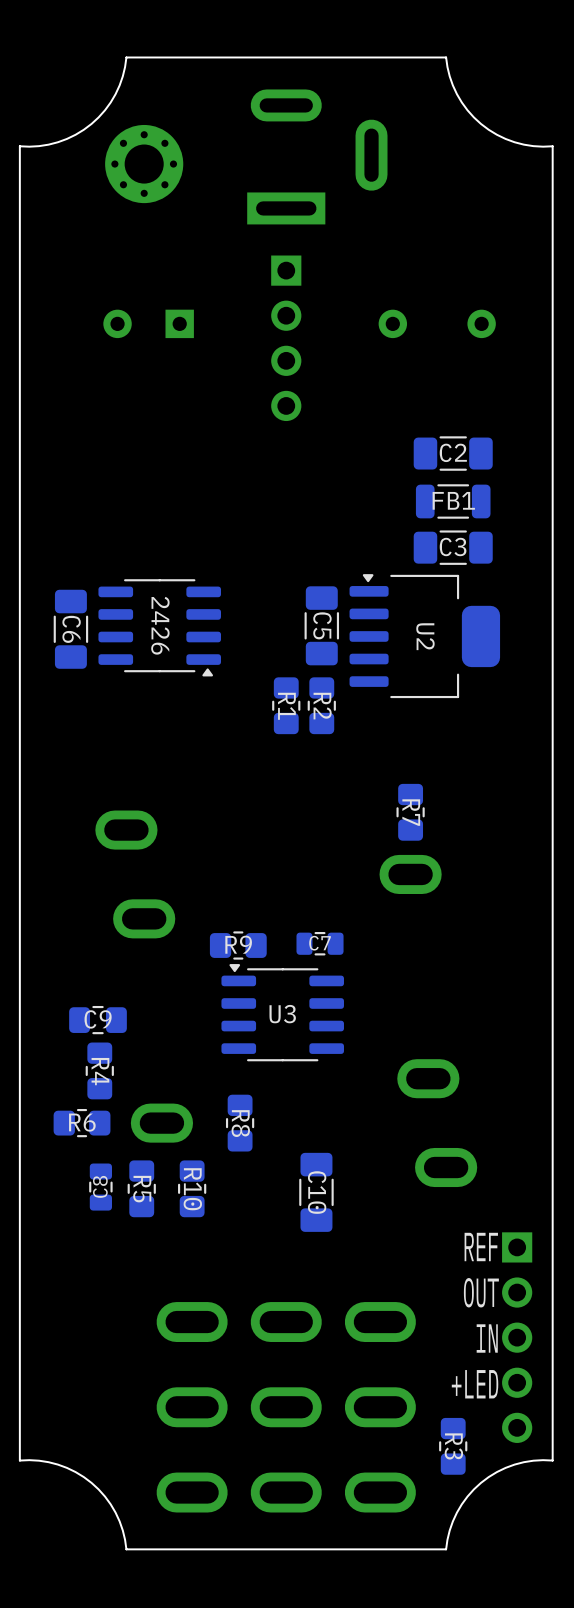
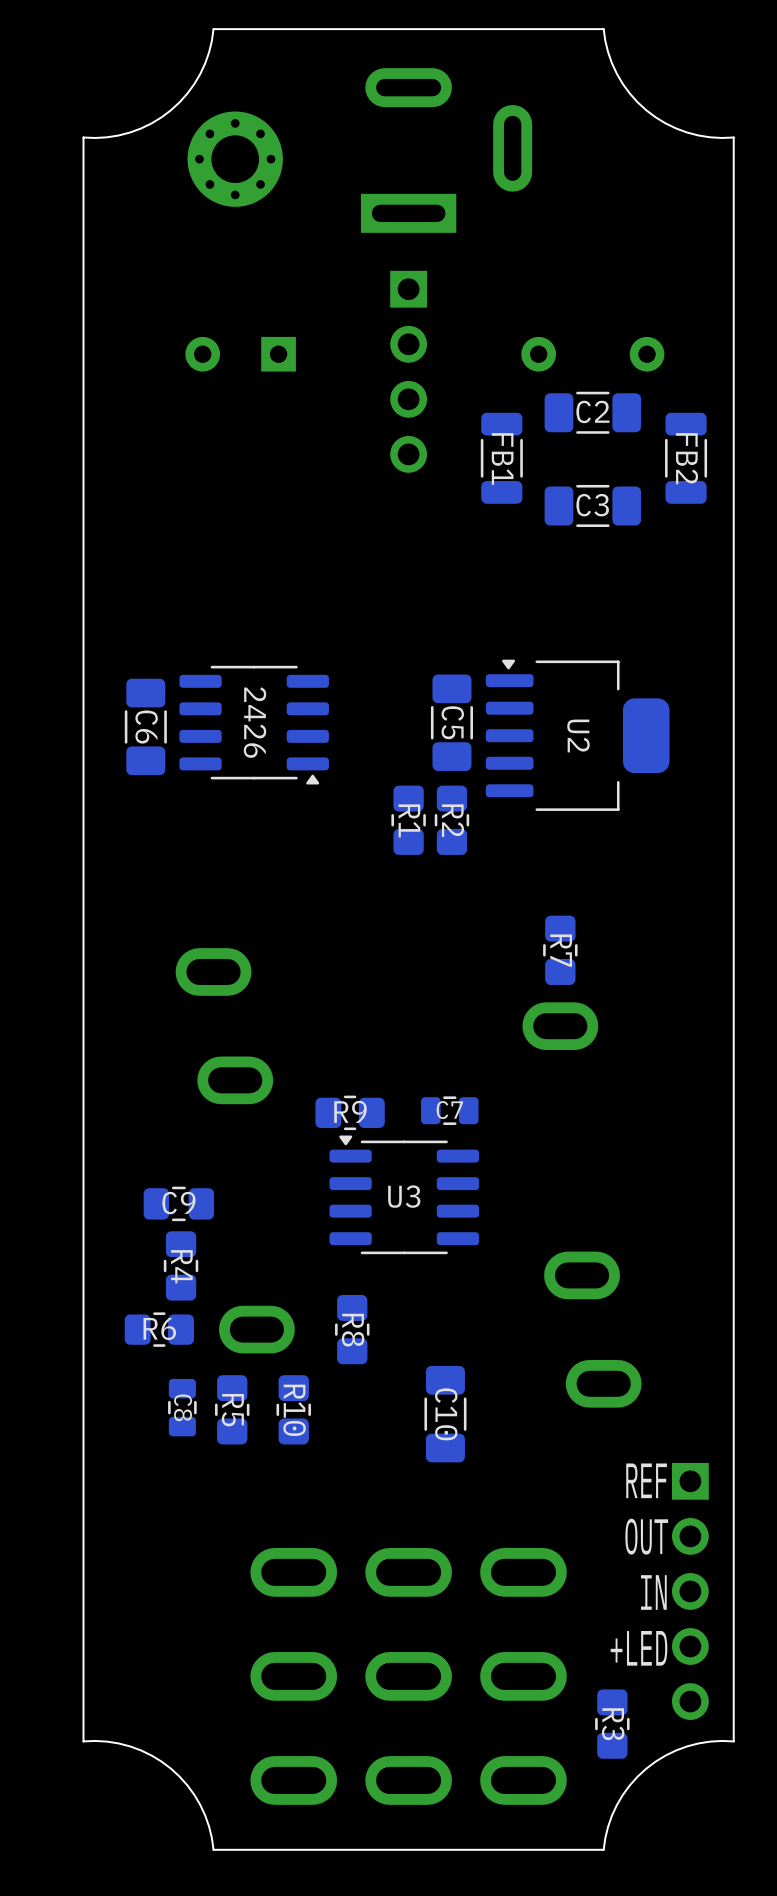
FB2: none -> (686, 458)
C2 position: (453, 453) -> (592, 412)
FB1 rotation: 0° (453, 501) -> 90° clockwise (501, 458)
FB1 position: (453, 501) -> (501, 458)
C3 position: (453, 547) -> (592, 505)
C8 name rotation: 0° (100, 1186) -> 180° (183, 1407)

